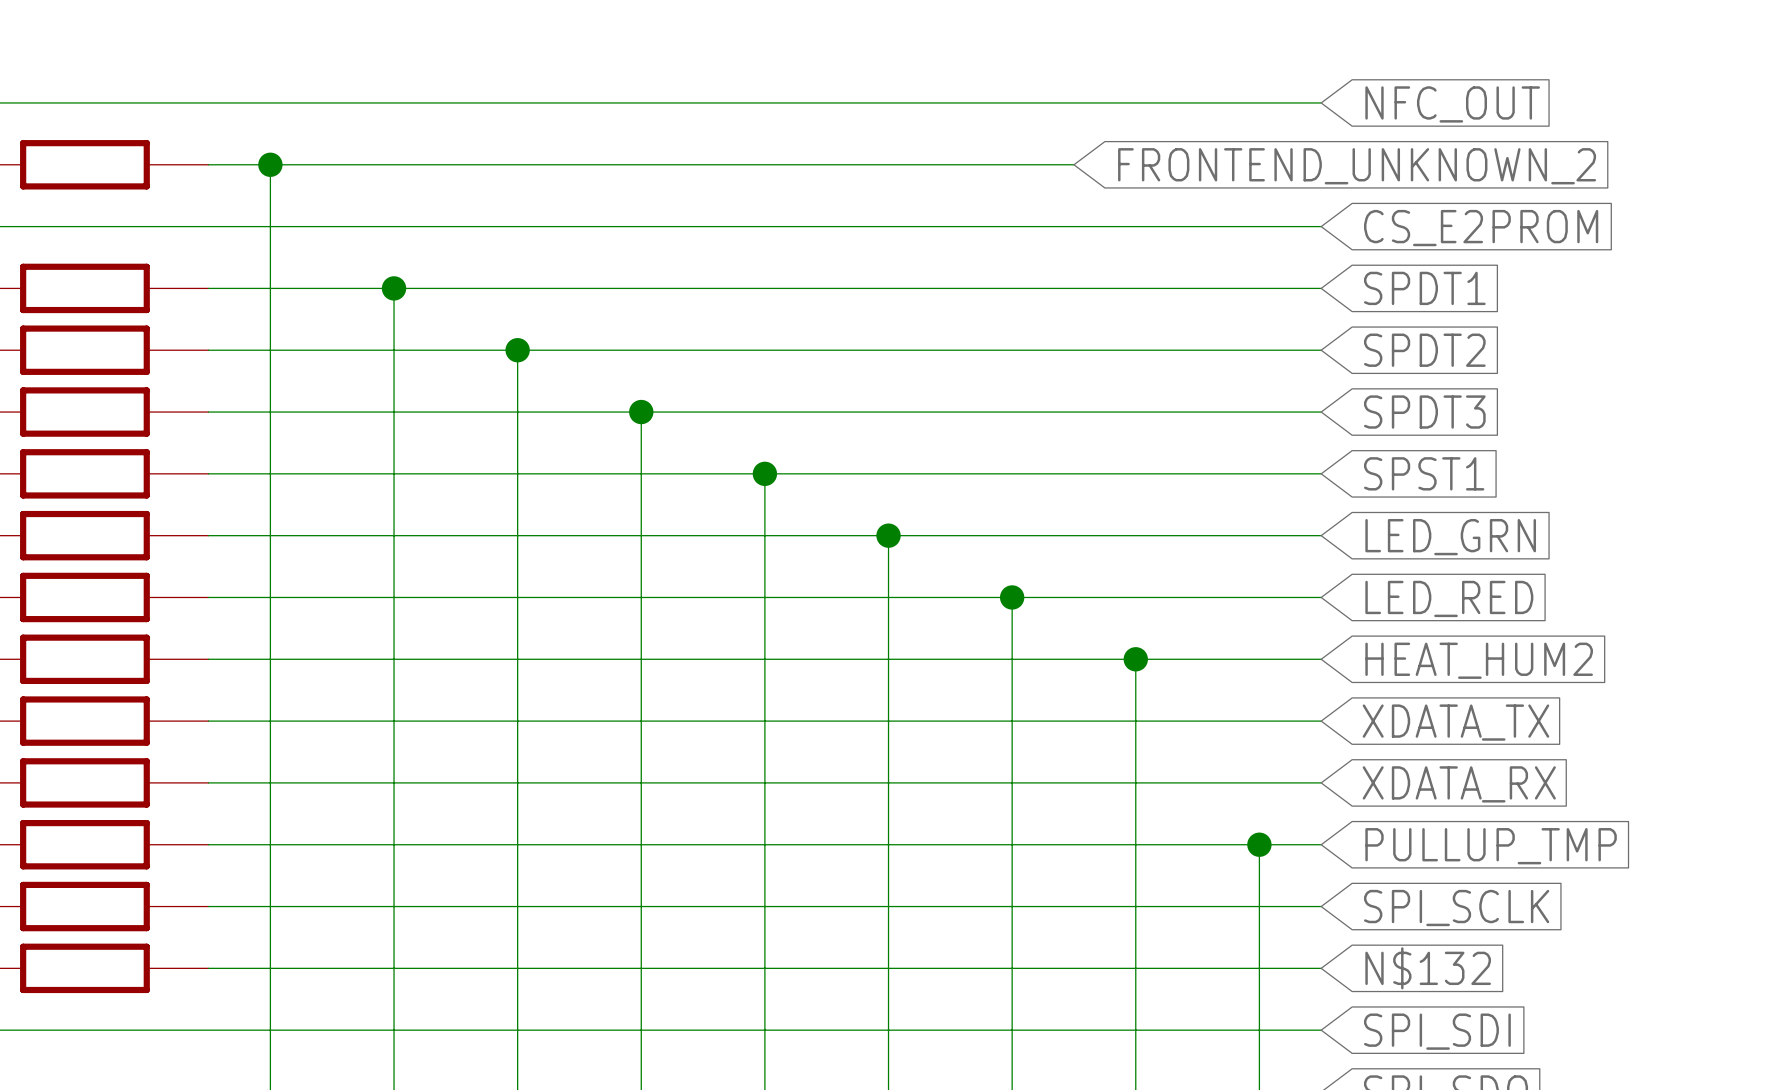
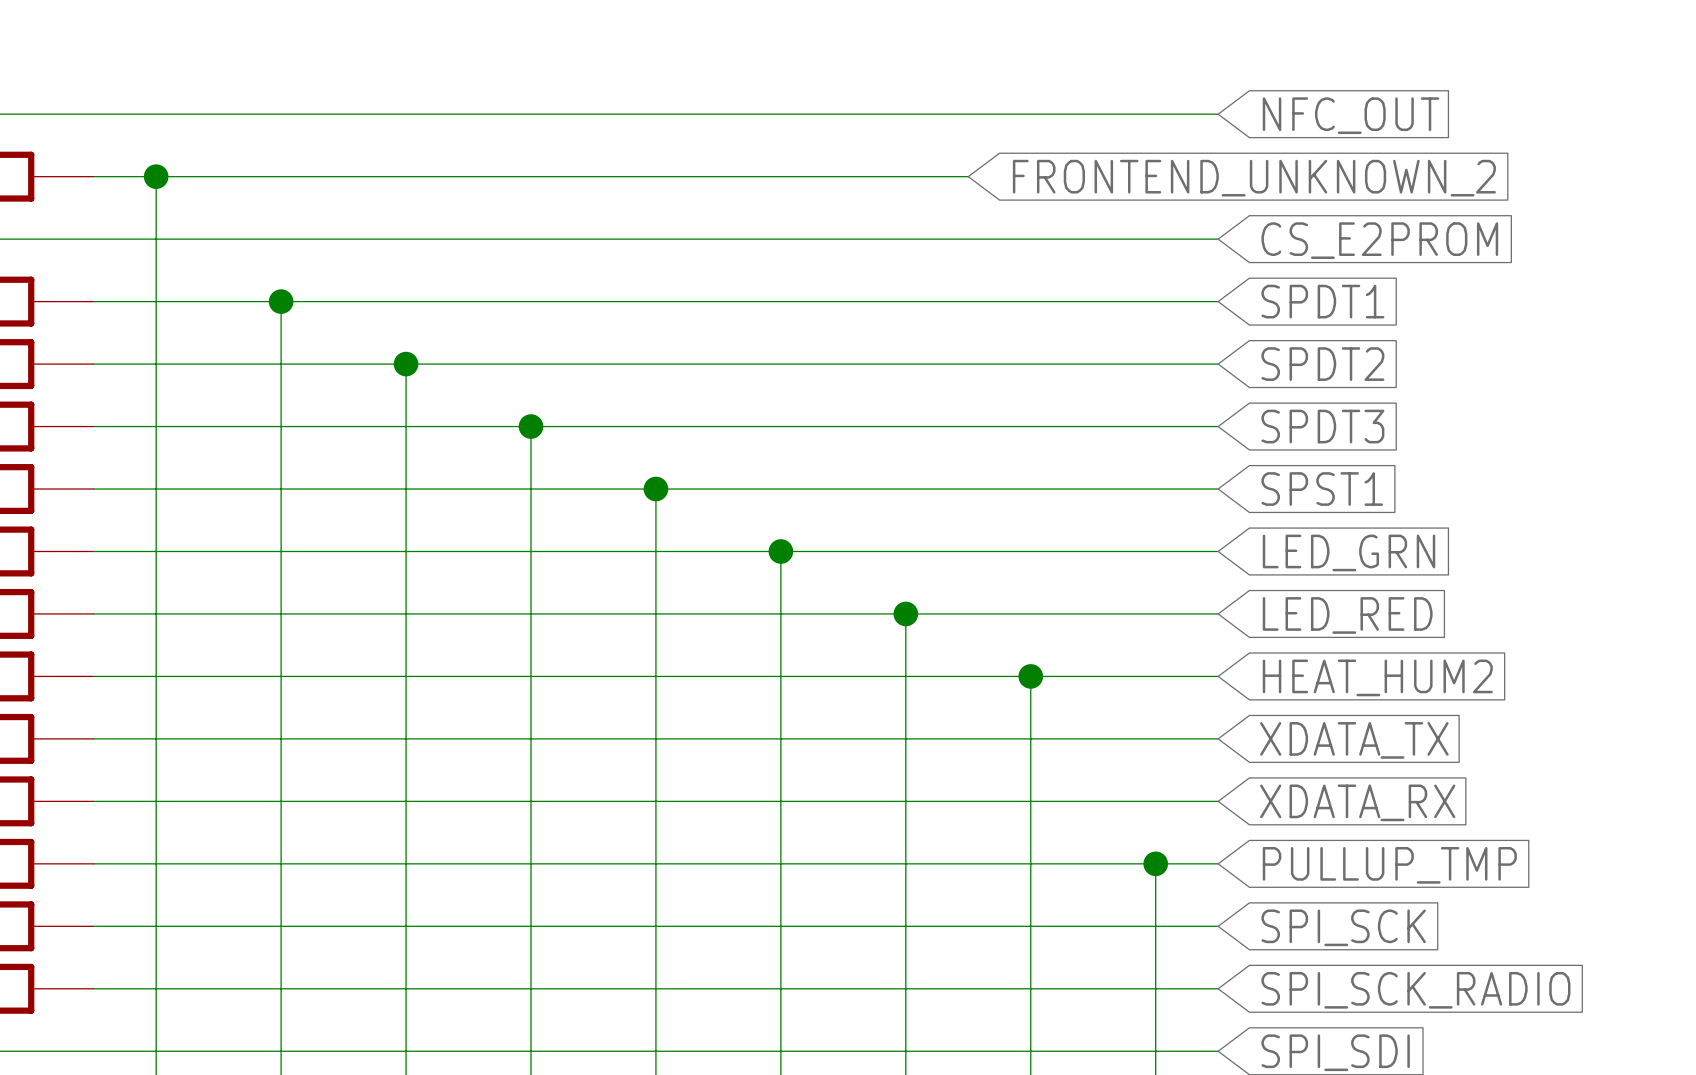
global label: SPI_SCLK (1456, 908) -> SPI_SCK (1343, 927)
global label: N$132 (1428, 968) -> SPI_SCK_RADIO (1415, 990)

